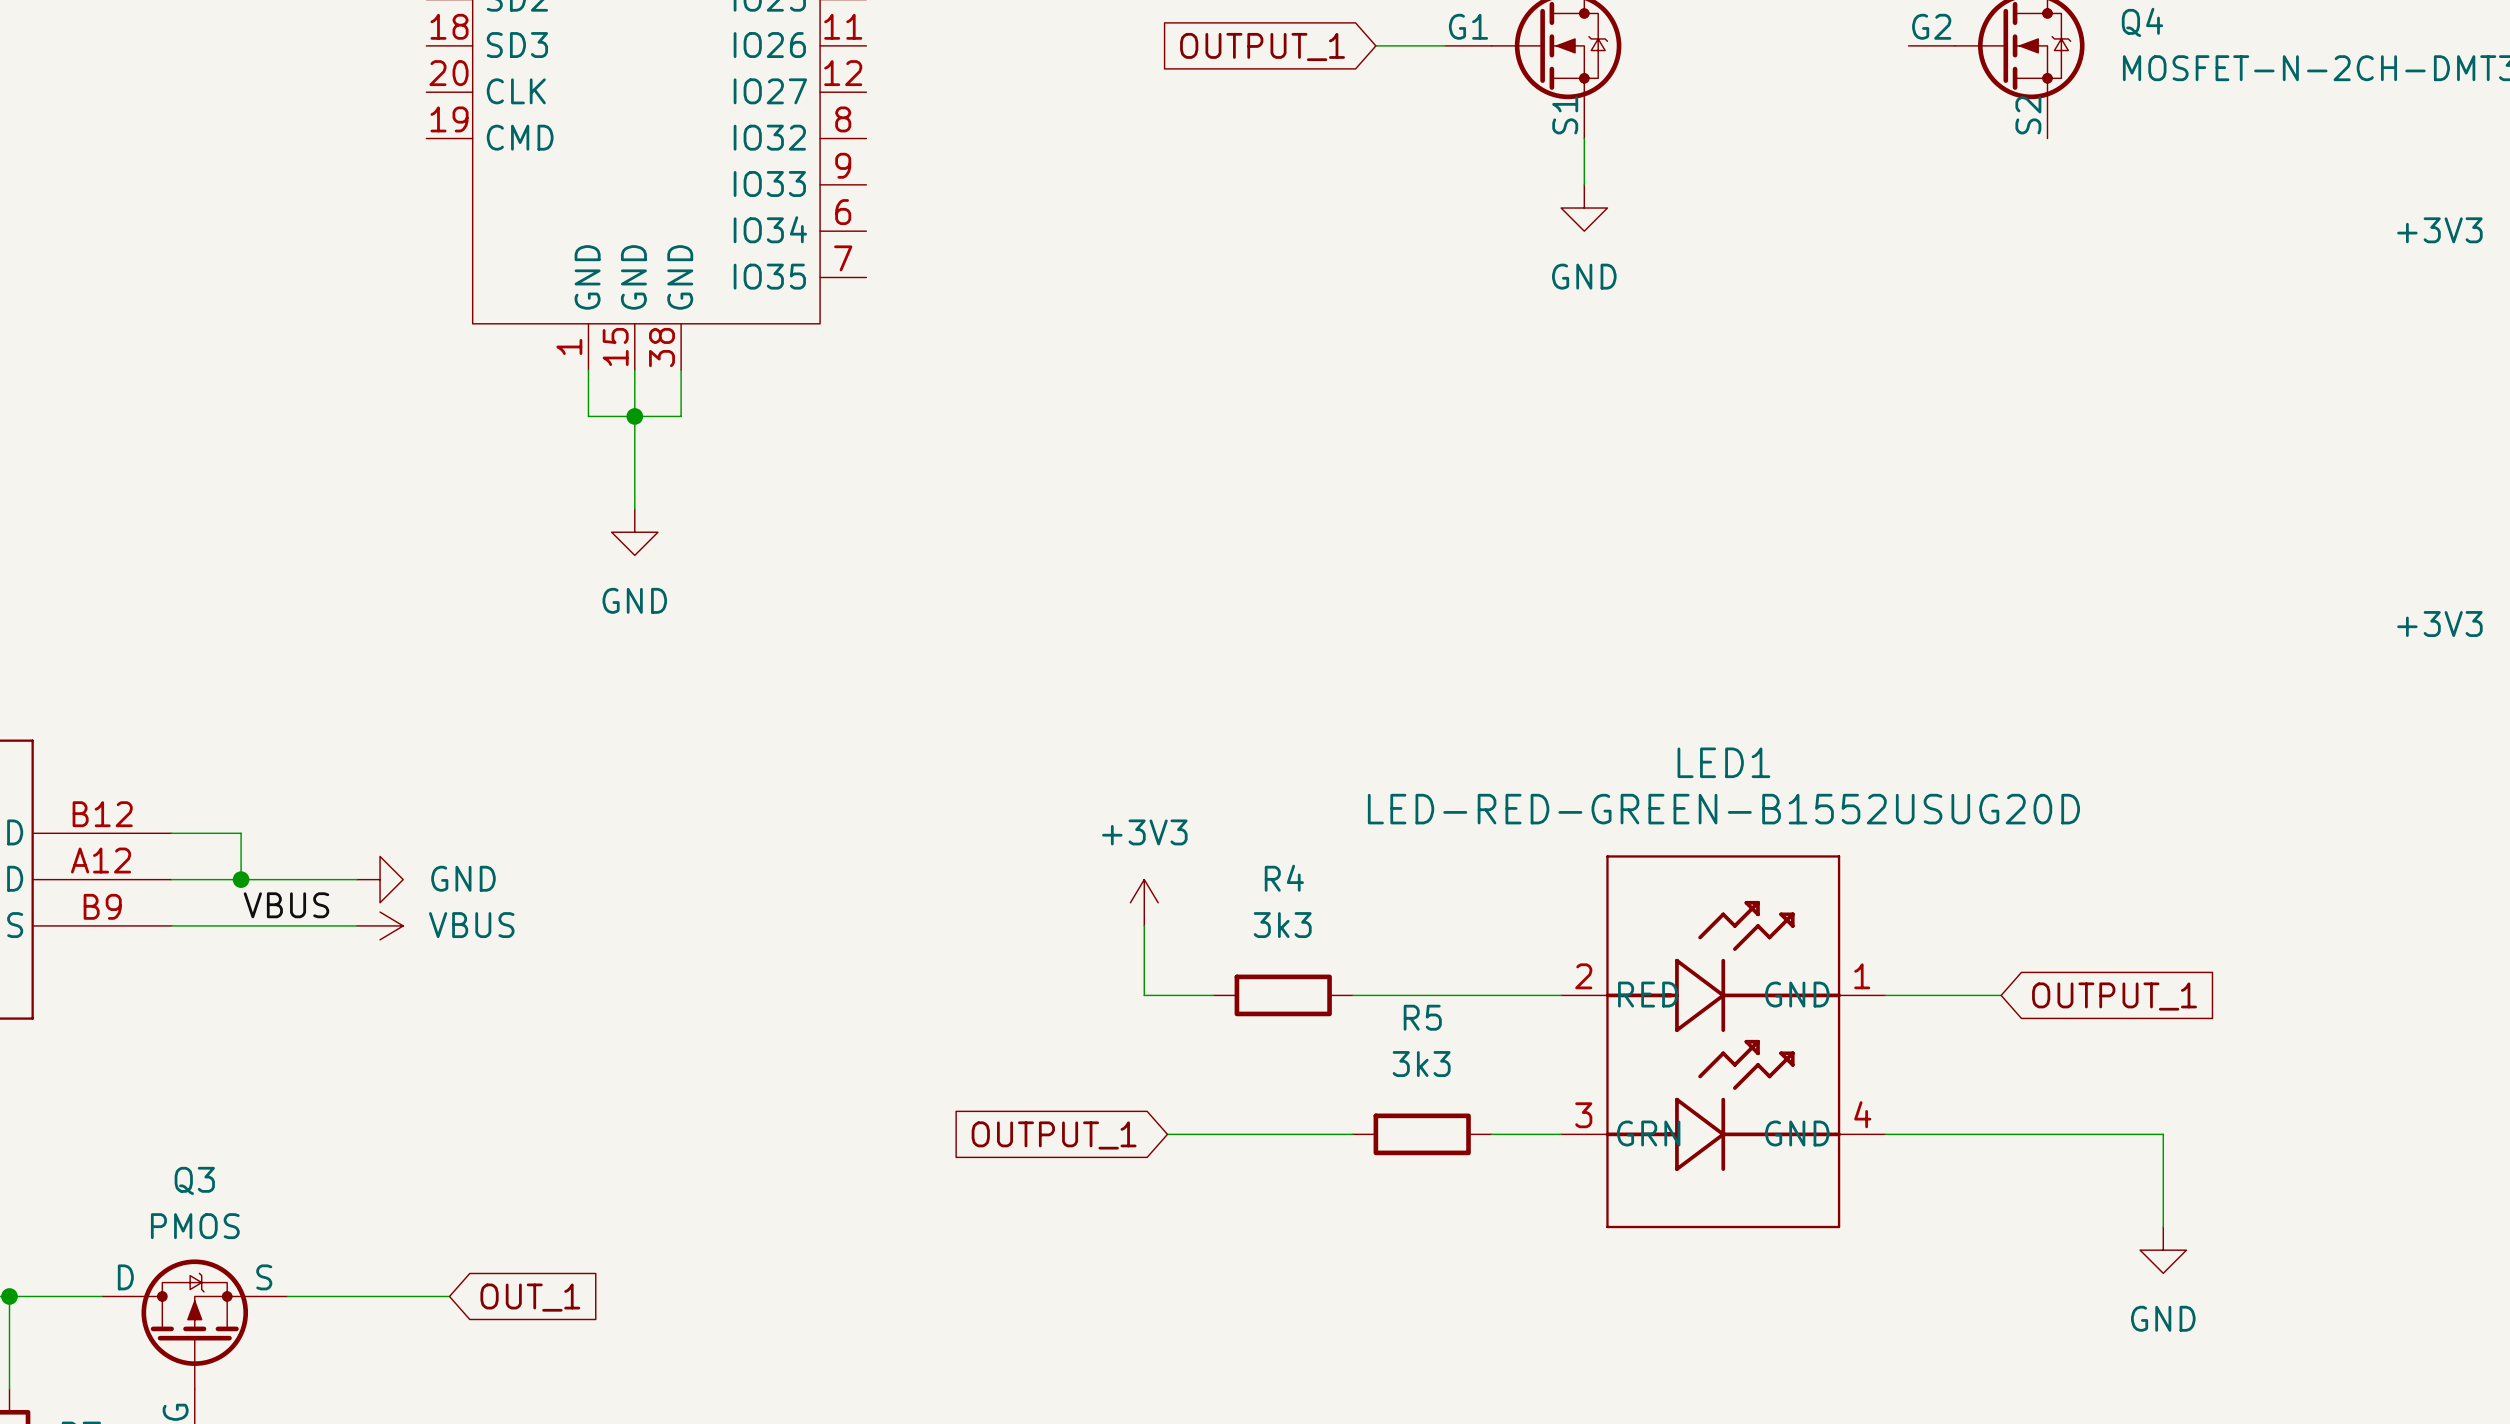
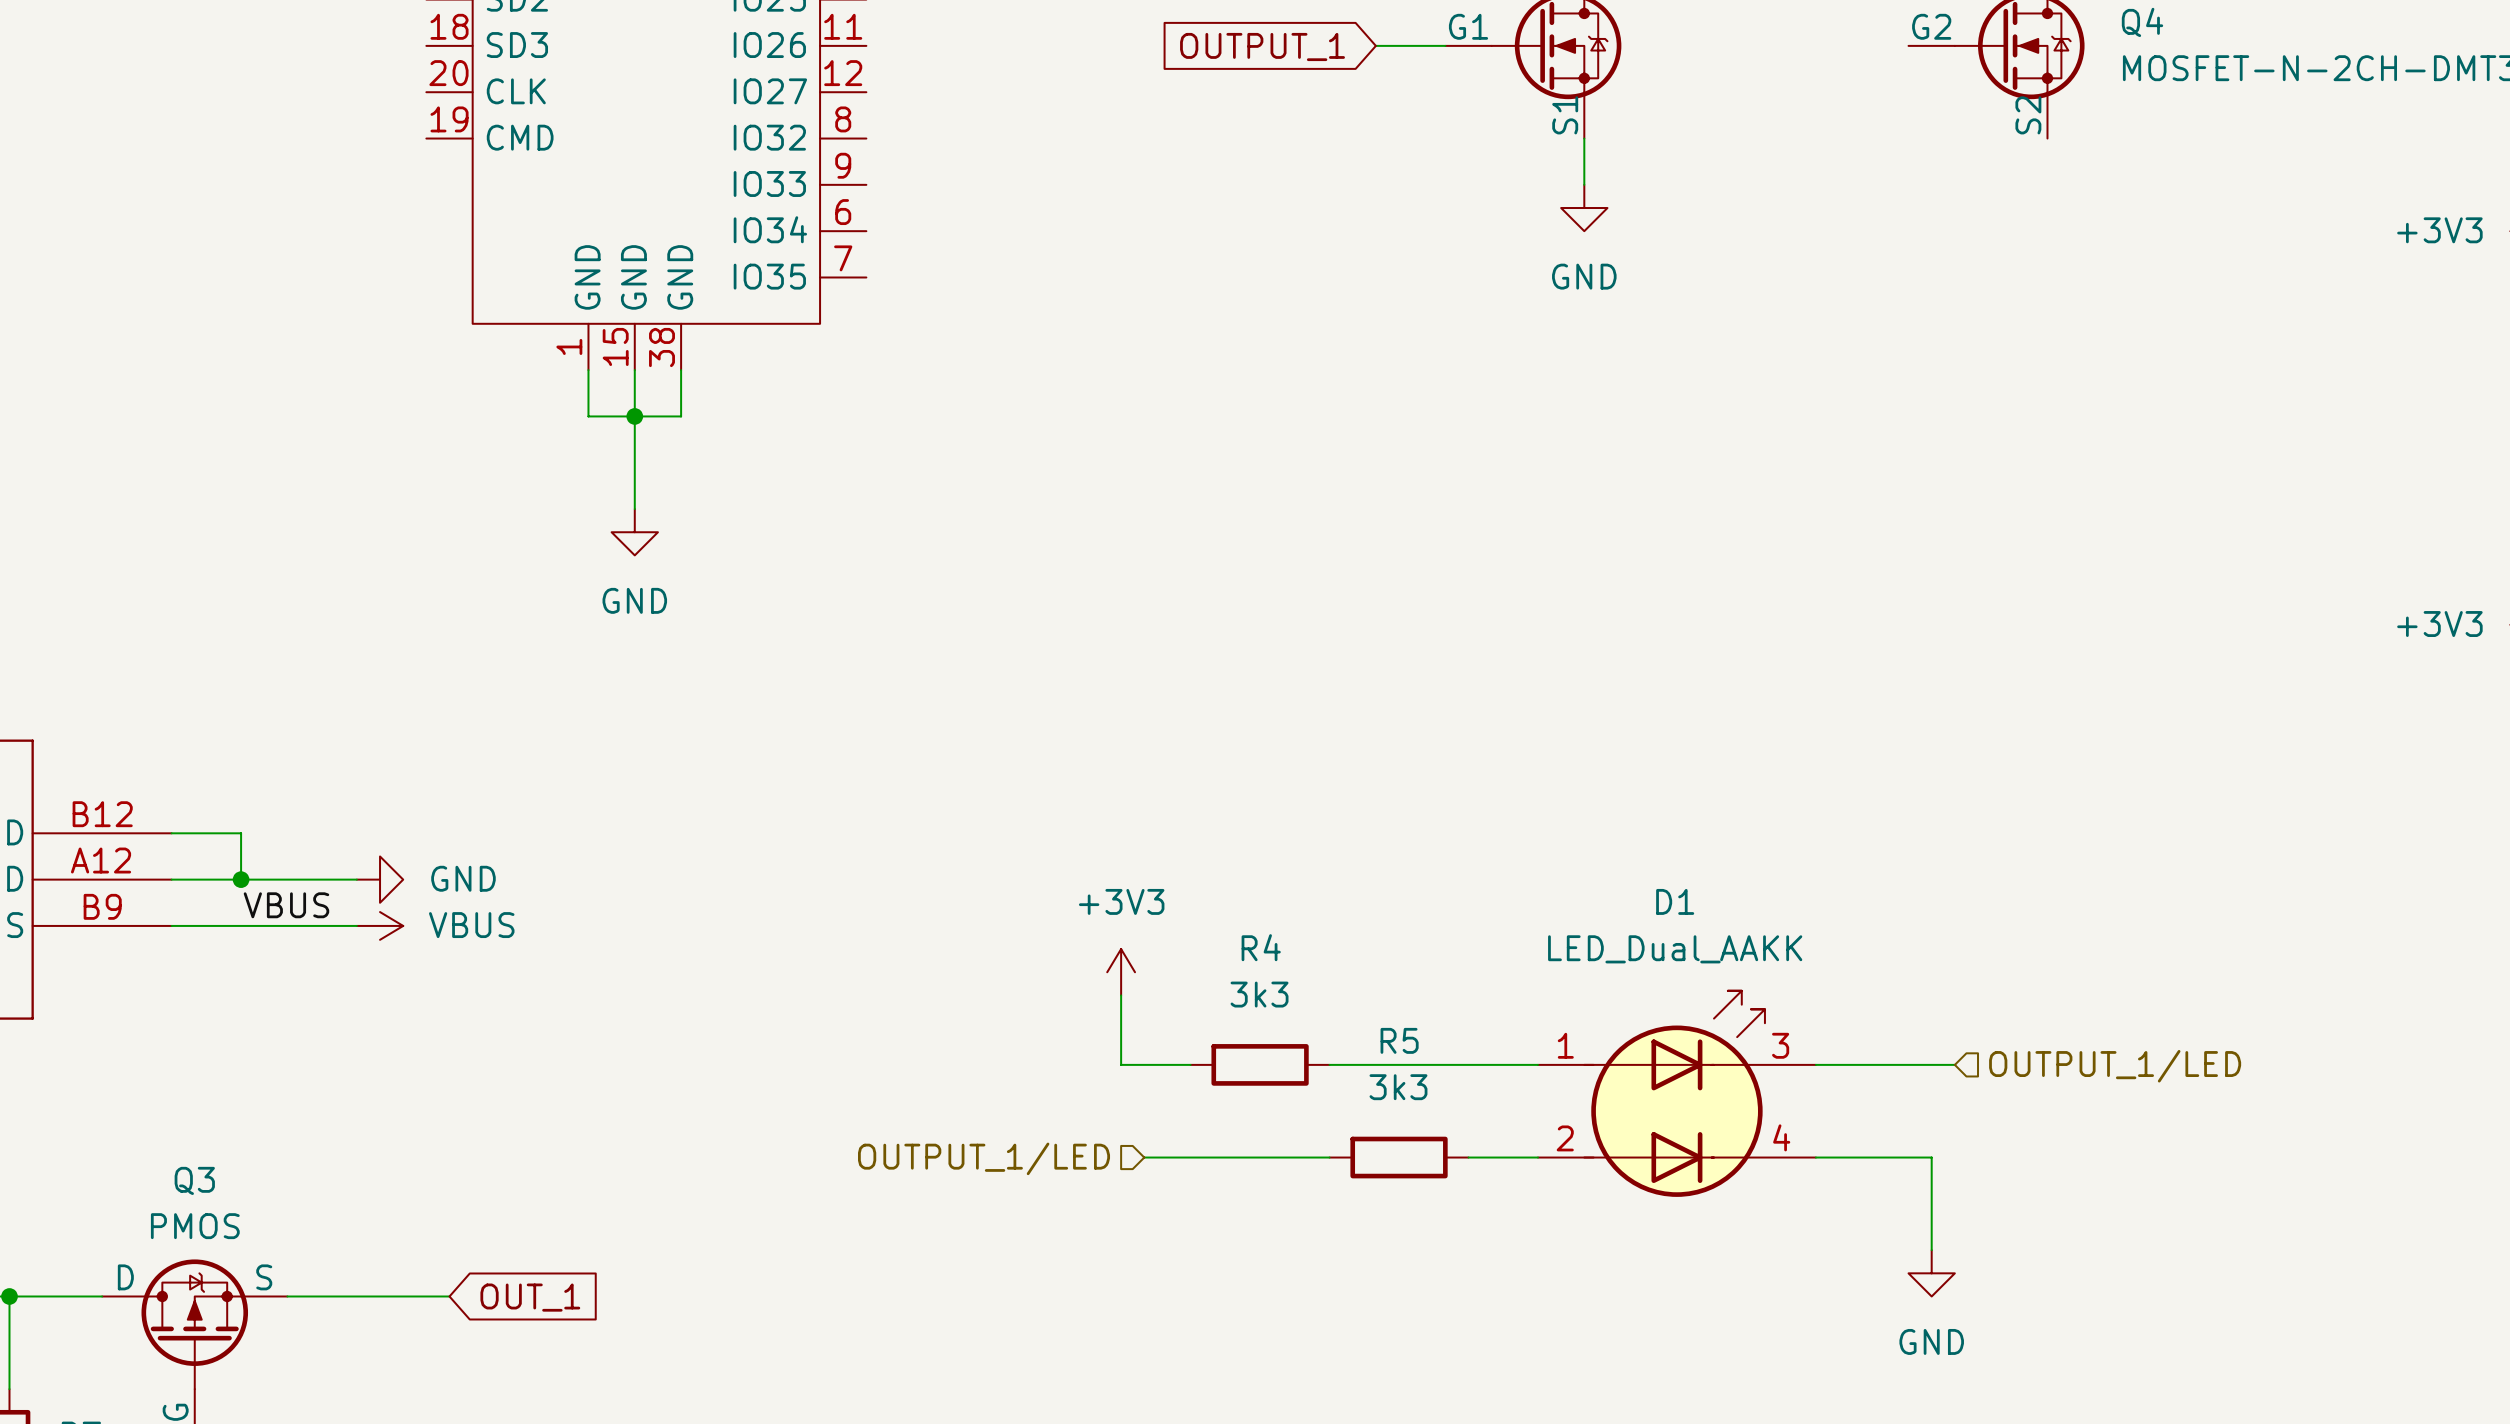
power symbol position: +3V3 (1144, 902) -> +3V3 (1121, 972)
wire: (1144, 925) (1144, 995) (1213, 995) -> (1121, 995) (1121, 1064) (1190, 1064)
R4 position: (1283, 995) -> (1260, 1064)
wire: (1352, 995) (1561, 995) -> (1329, 1064) (1537, 1064)
wire: (1885, 995) (2001, 995) -> none
global label: OUTPUT_1 (2114, 996) -> none
LED1: LED-RED-GREEN-B1552USUG20D (1723, 1041) -> none
wire: none -> (1815, 1064) (1954, 1064)
hierarchical label: none -> OUTPUT_1/LED (2115, 1066)
D1: none -> LED_Dual_AAKK (1676, 1093)
wire: (1167, 1134) (1352, 1134) -> (1144, 1157) (1329, 1157)
R5 position: (1422, 1134) -> (1399, 1157)
wire: (1491, 1134) (1561, 1134) -> (1468, 1157) (1537, 1157)
wire: (1885, 1134) (2163, 1134) (2163, 1227) -> none
global label: OUTPUT_1 (1054, 1135) -> none
wire: none -> (1815, 1157) (1931, 1157) (1931, 1250)
hierarchical label: none -> OUTPUT_1/LED (984, 1158)
power symbol position: GND (2163, 1250) -> GND (1931, 1273)

